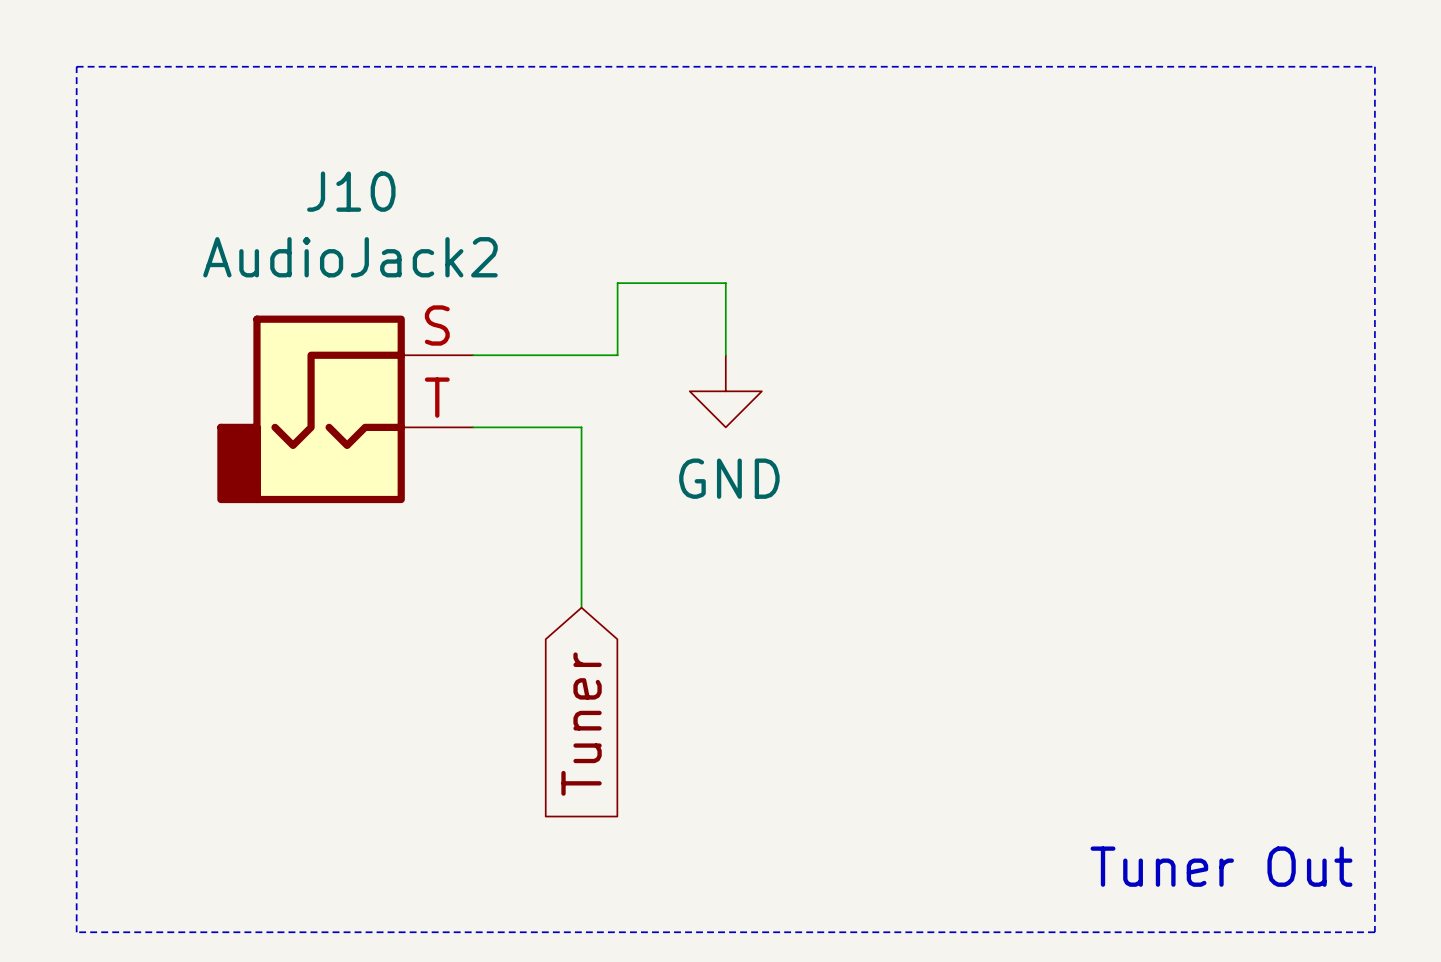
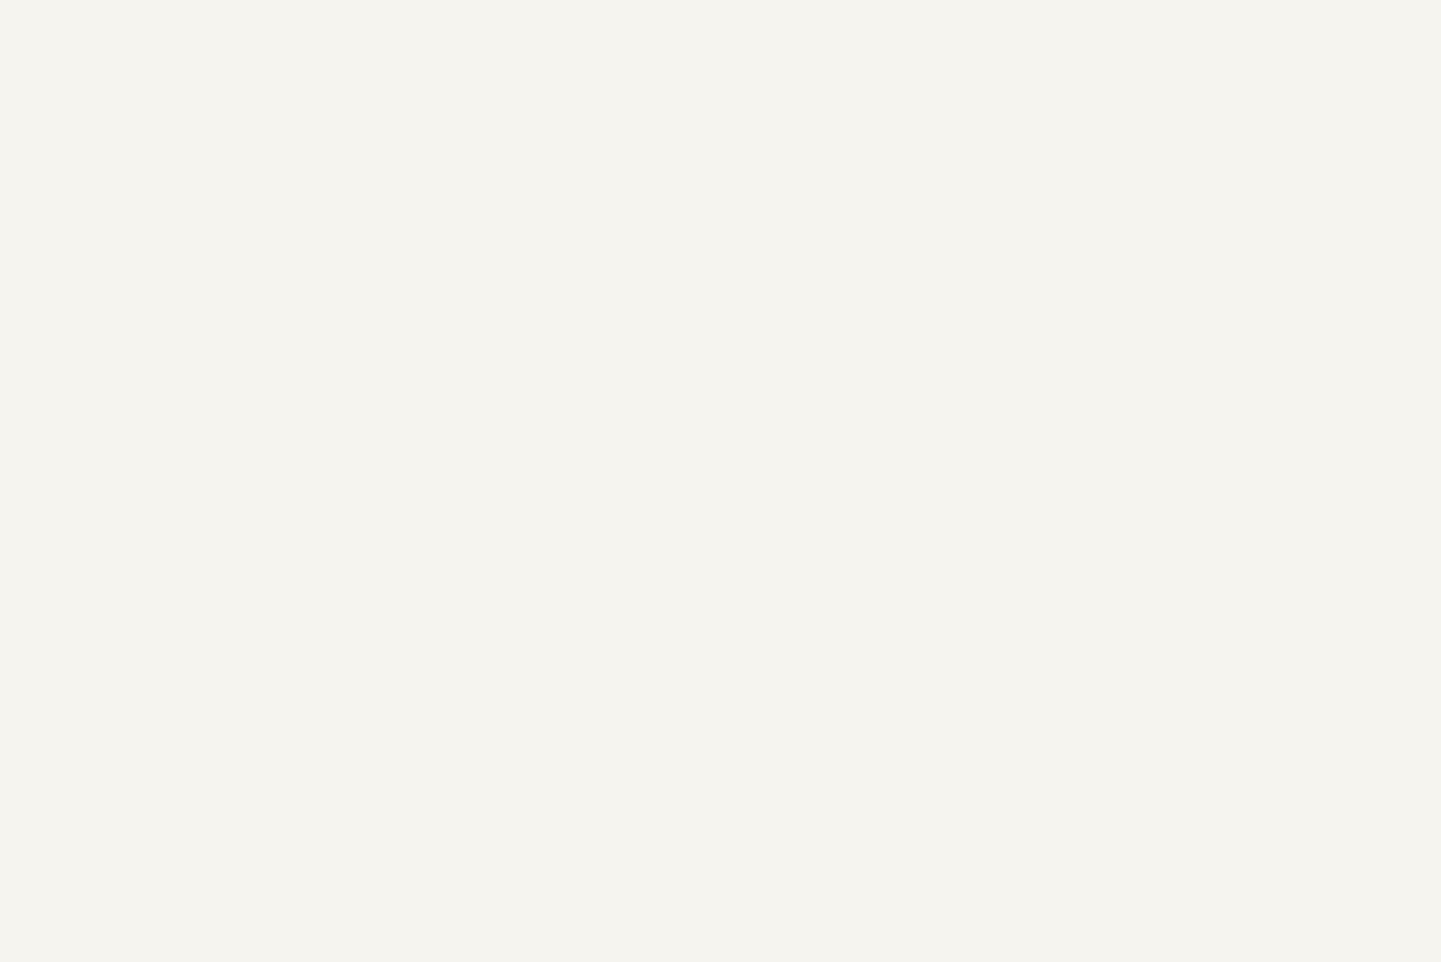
line: (76, 66) (76, 932) (1374, 932) (1374, 66) (76, 66) -> none
wire: (473, 355) (617, 355) (617, 283) (725, 283) (725, 355) -> none
power symbol: GND (725, 391) -> none
J10: AudioJack2 (345, 409) -> none
wire: (473, 427) (581, 427) (581, 607) -> none
global label: Tuner (581, 724) -> none
text: Tuner Out (1221, 866) -> none

